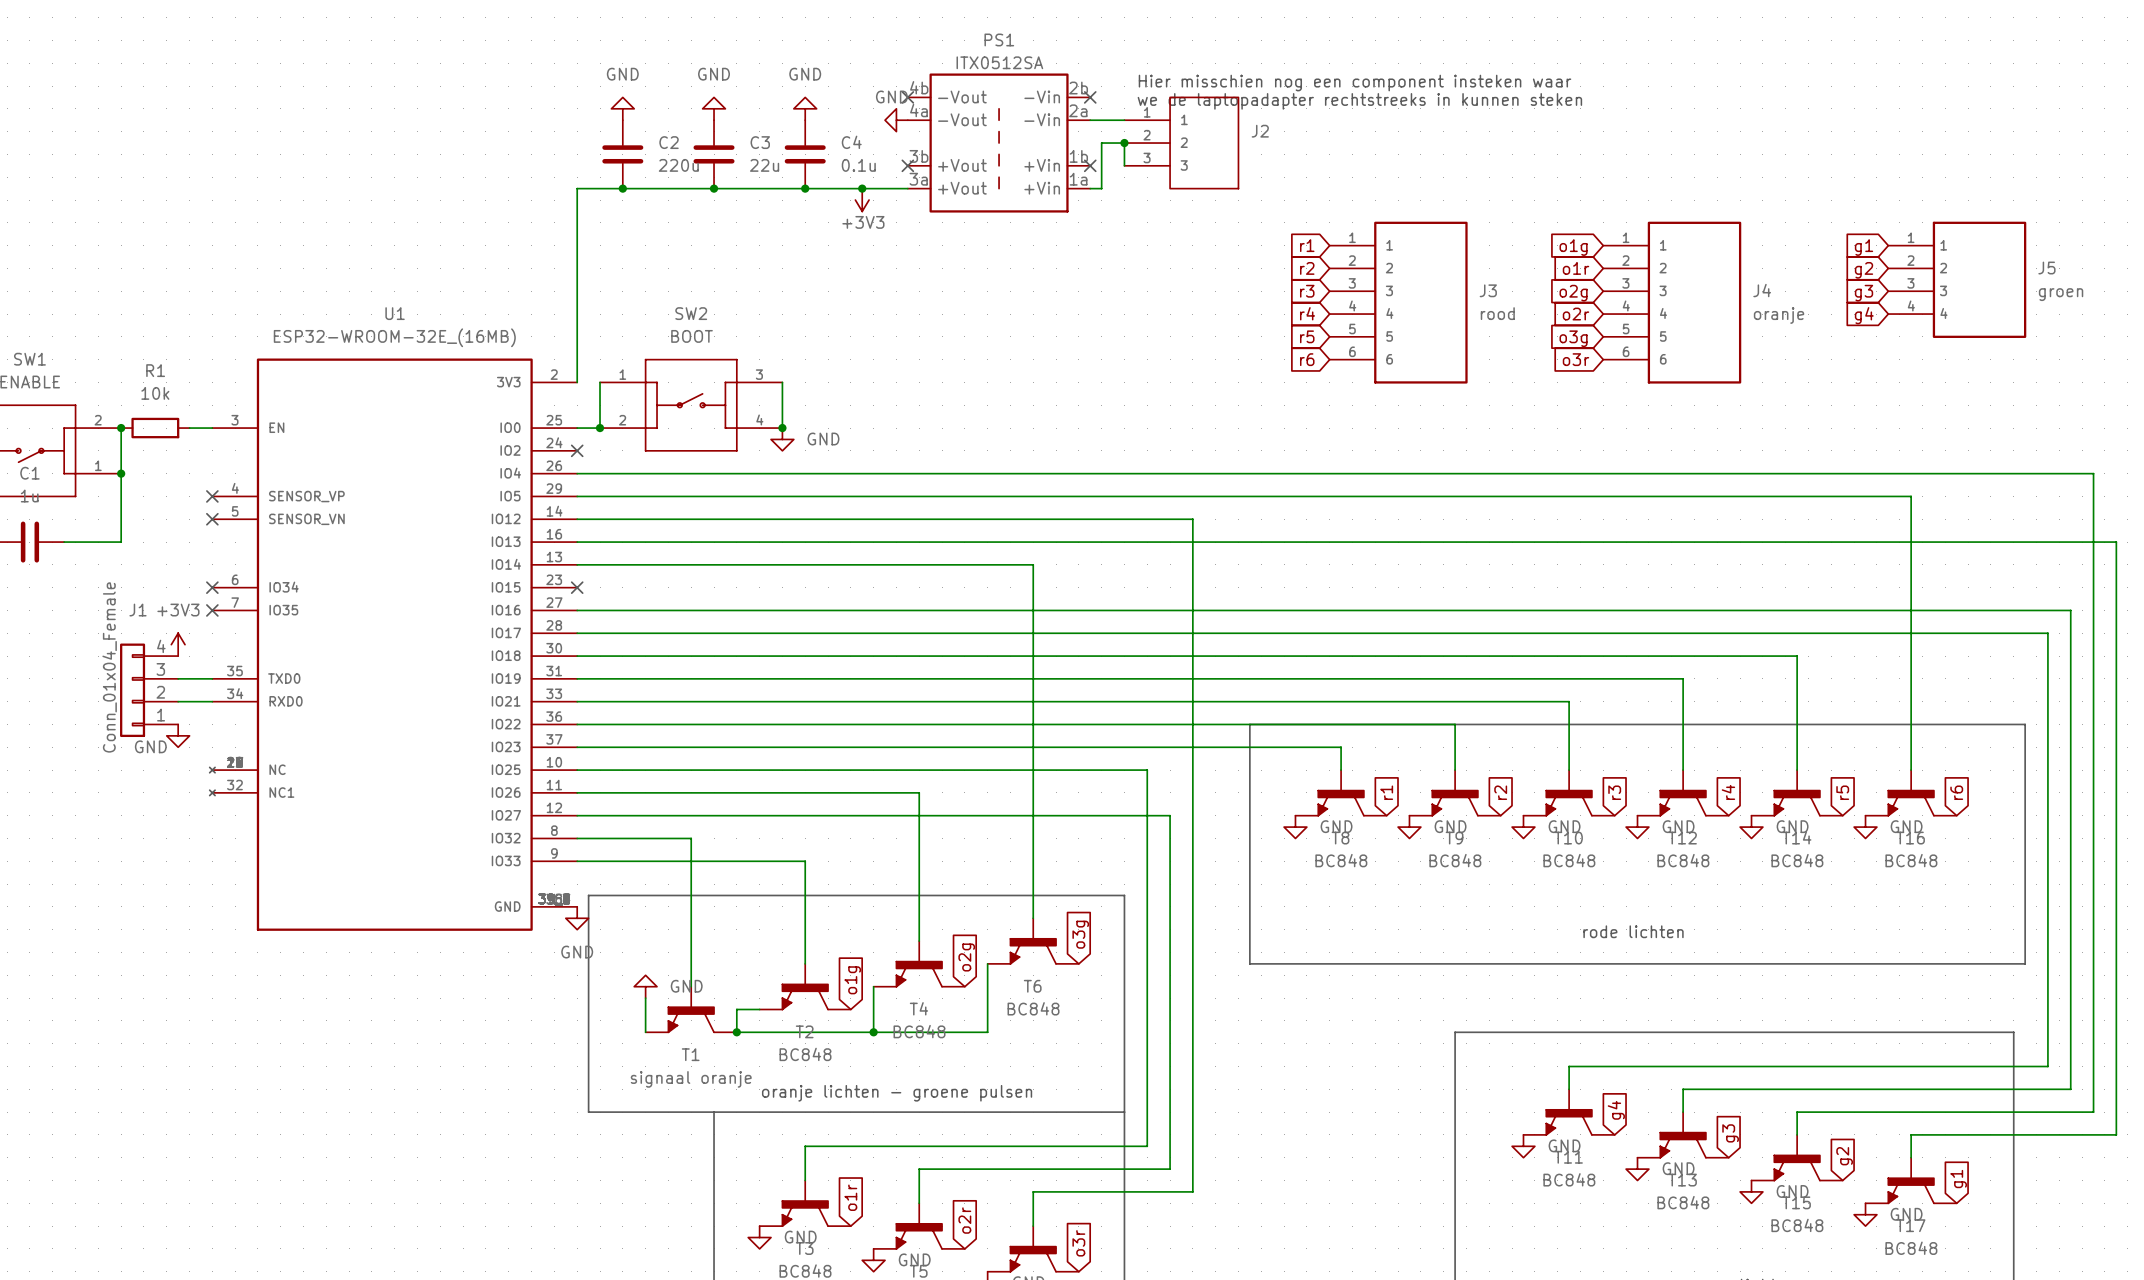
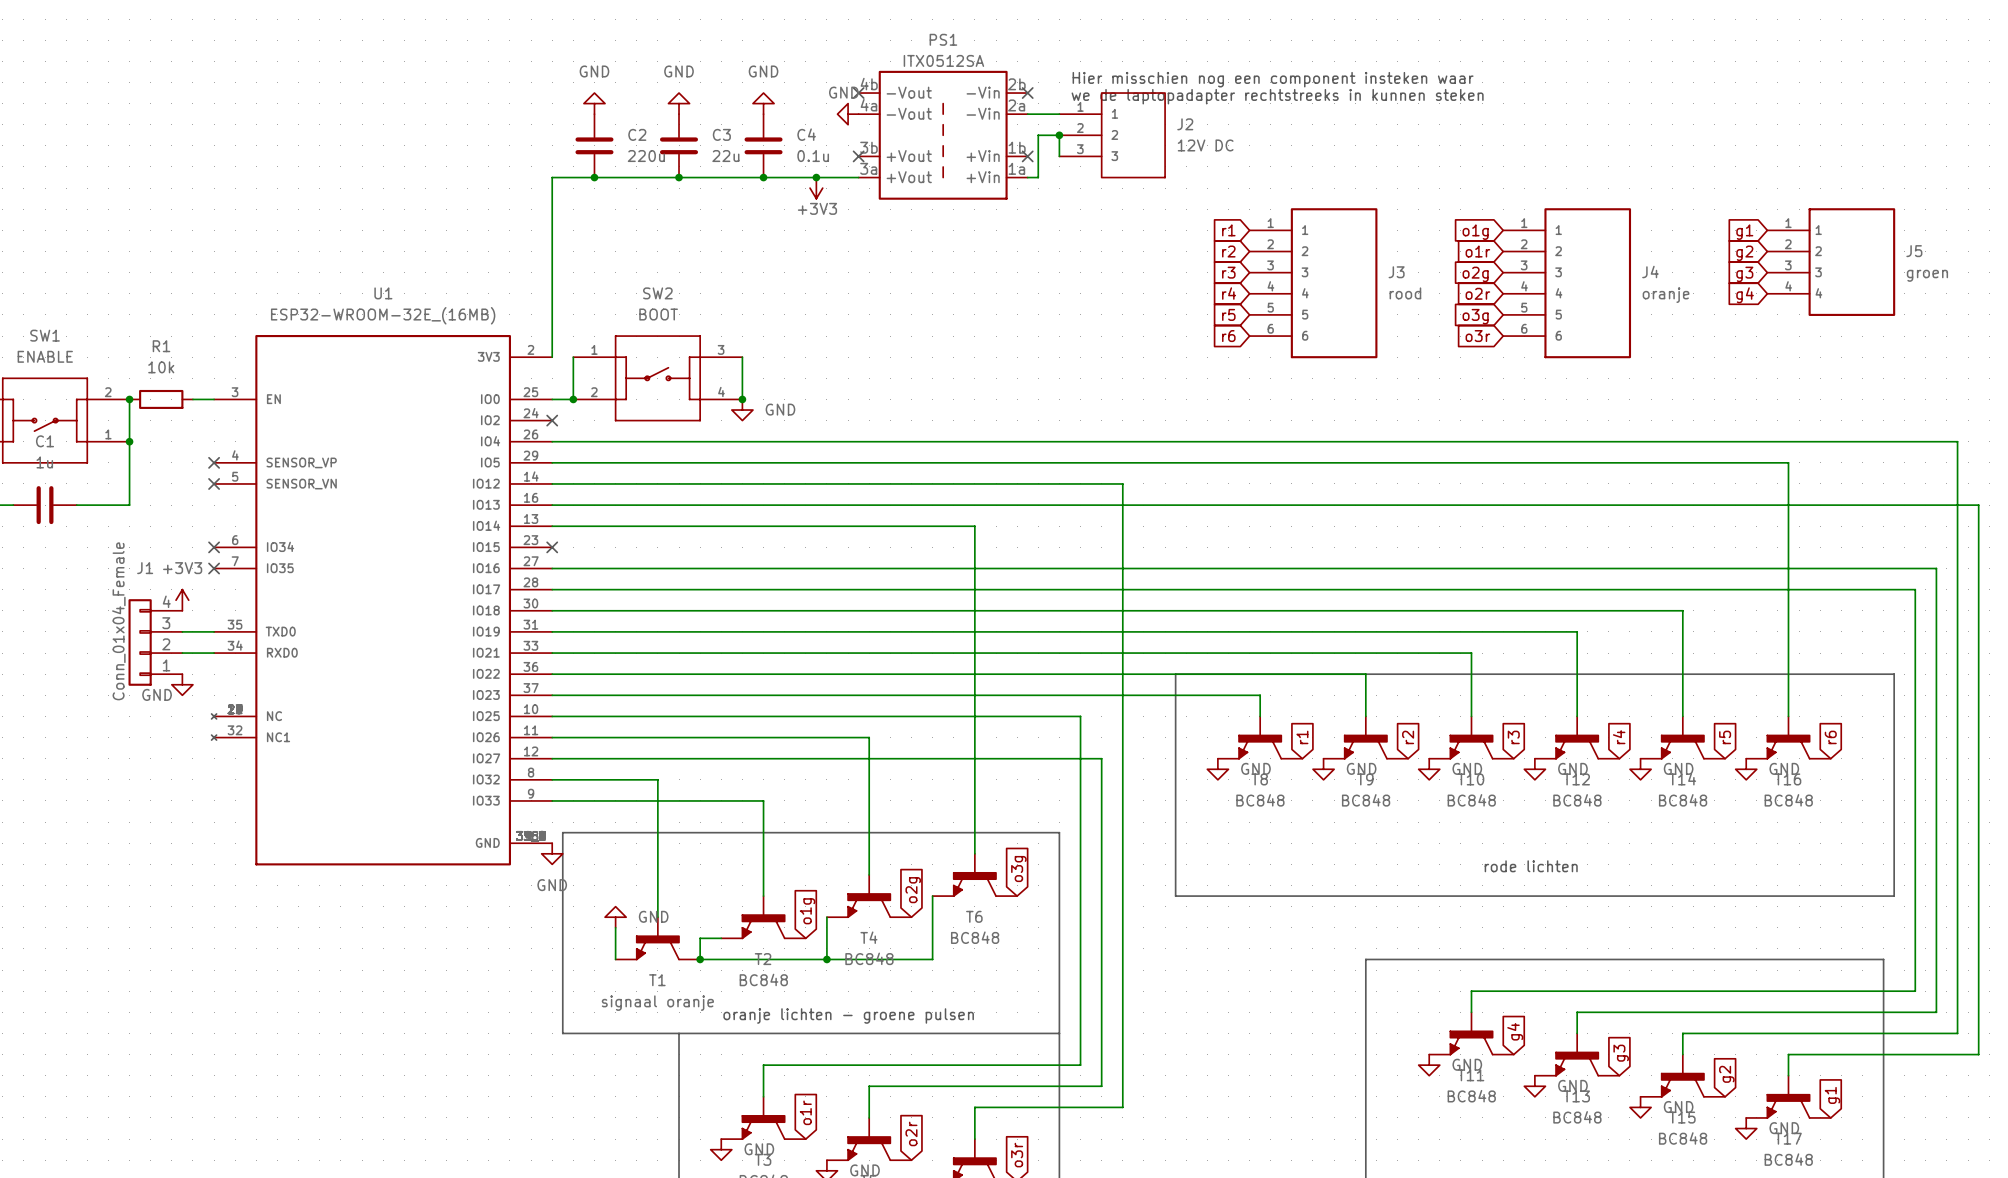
J2 value: none -> 12V DC (1205, 145)

